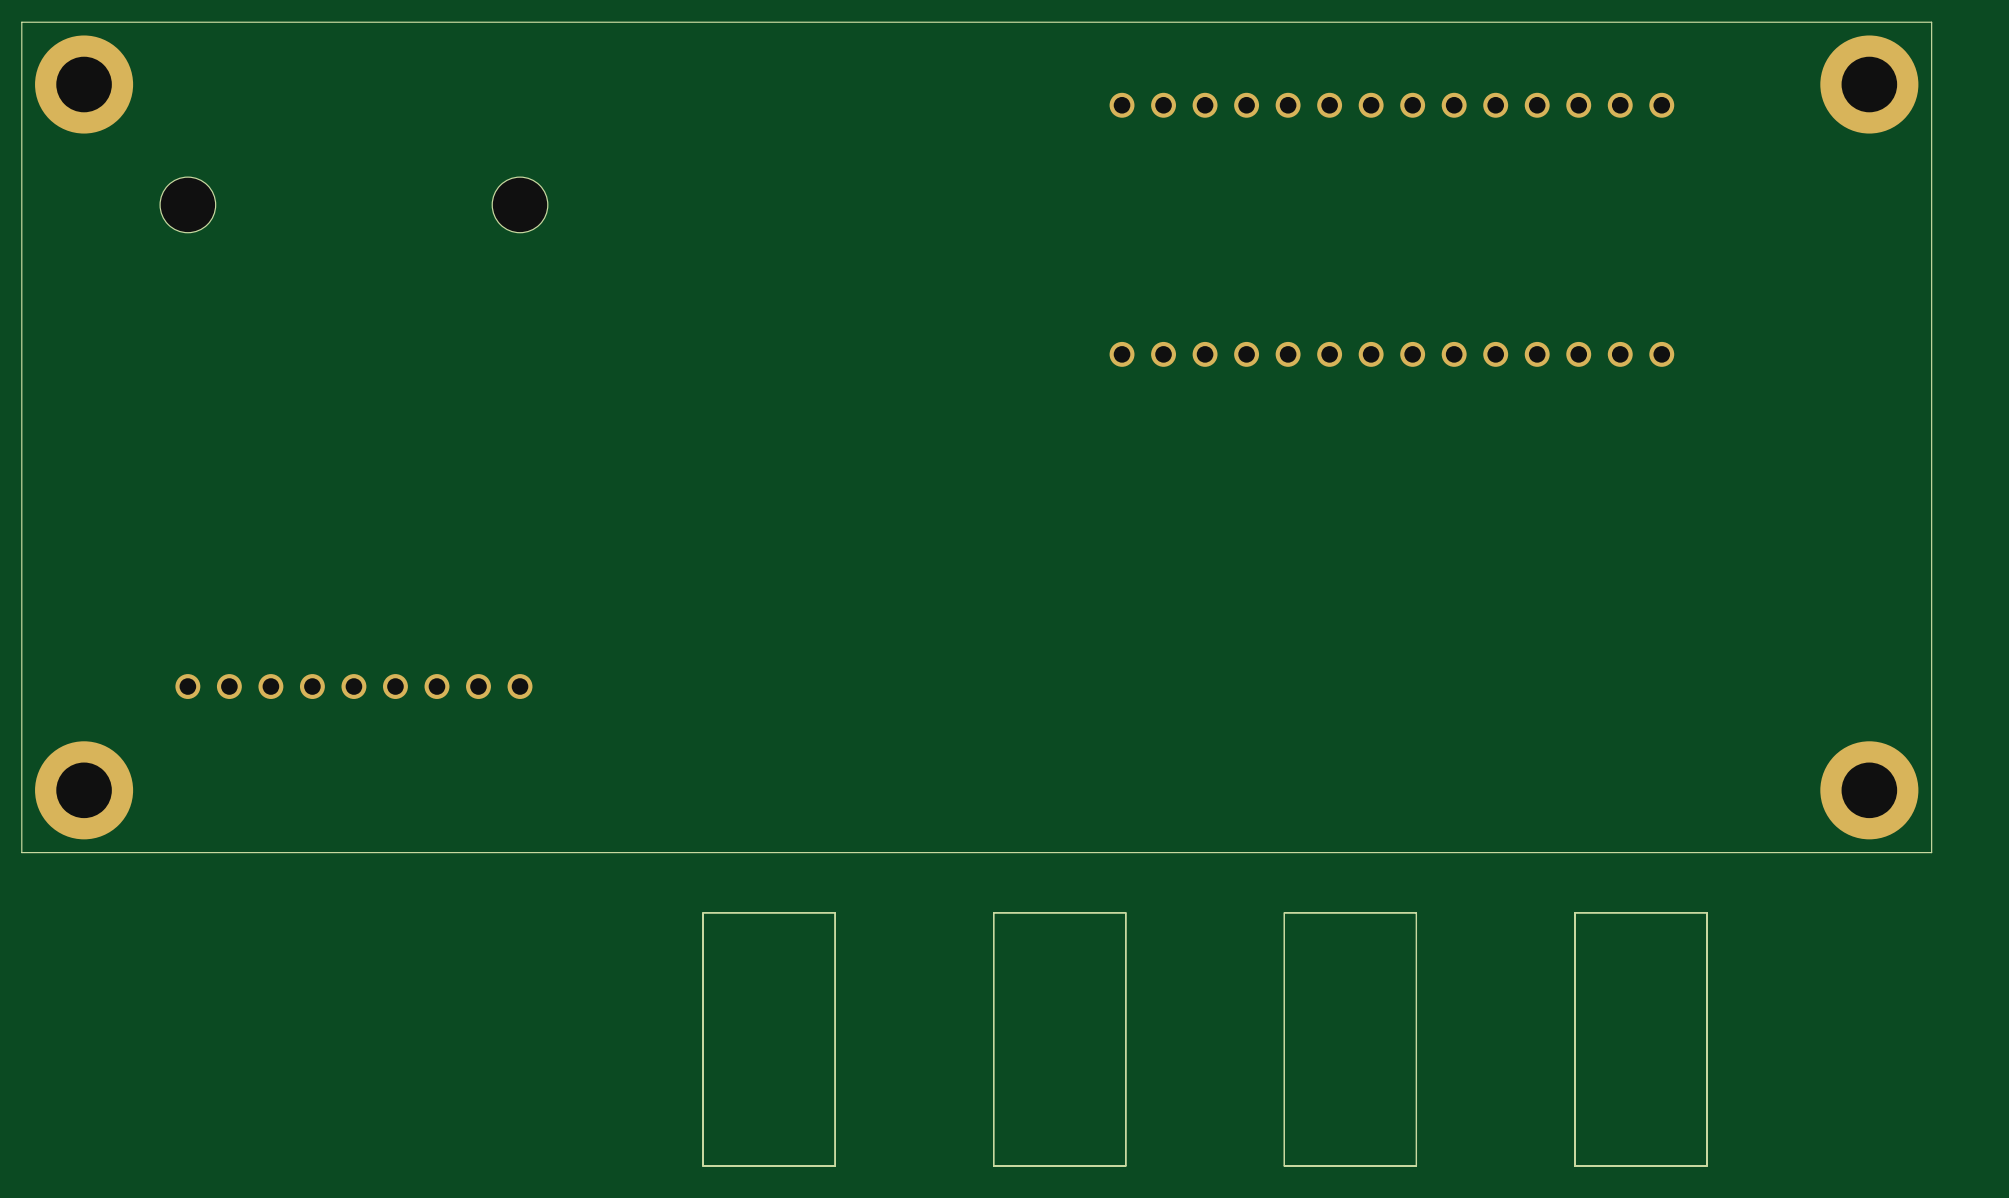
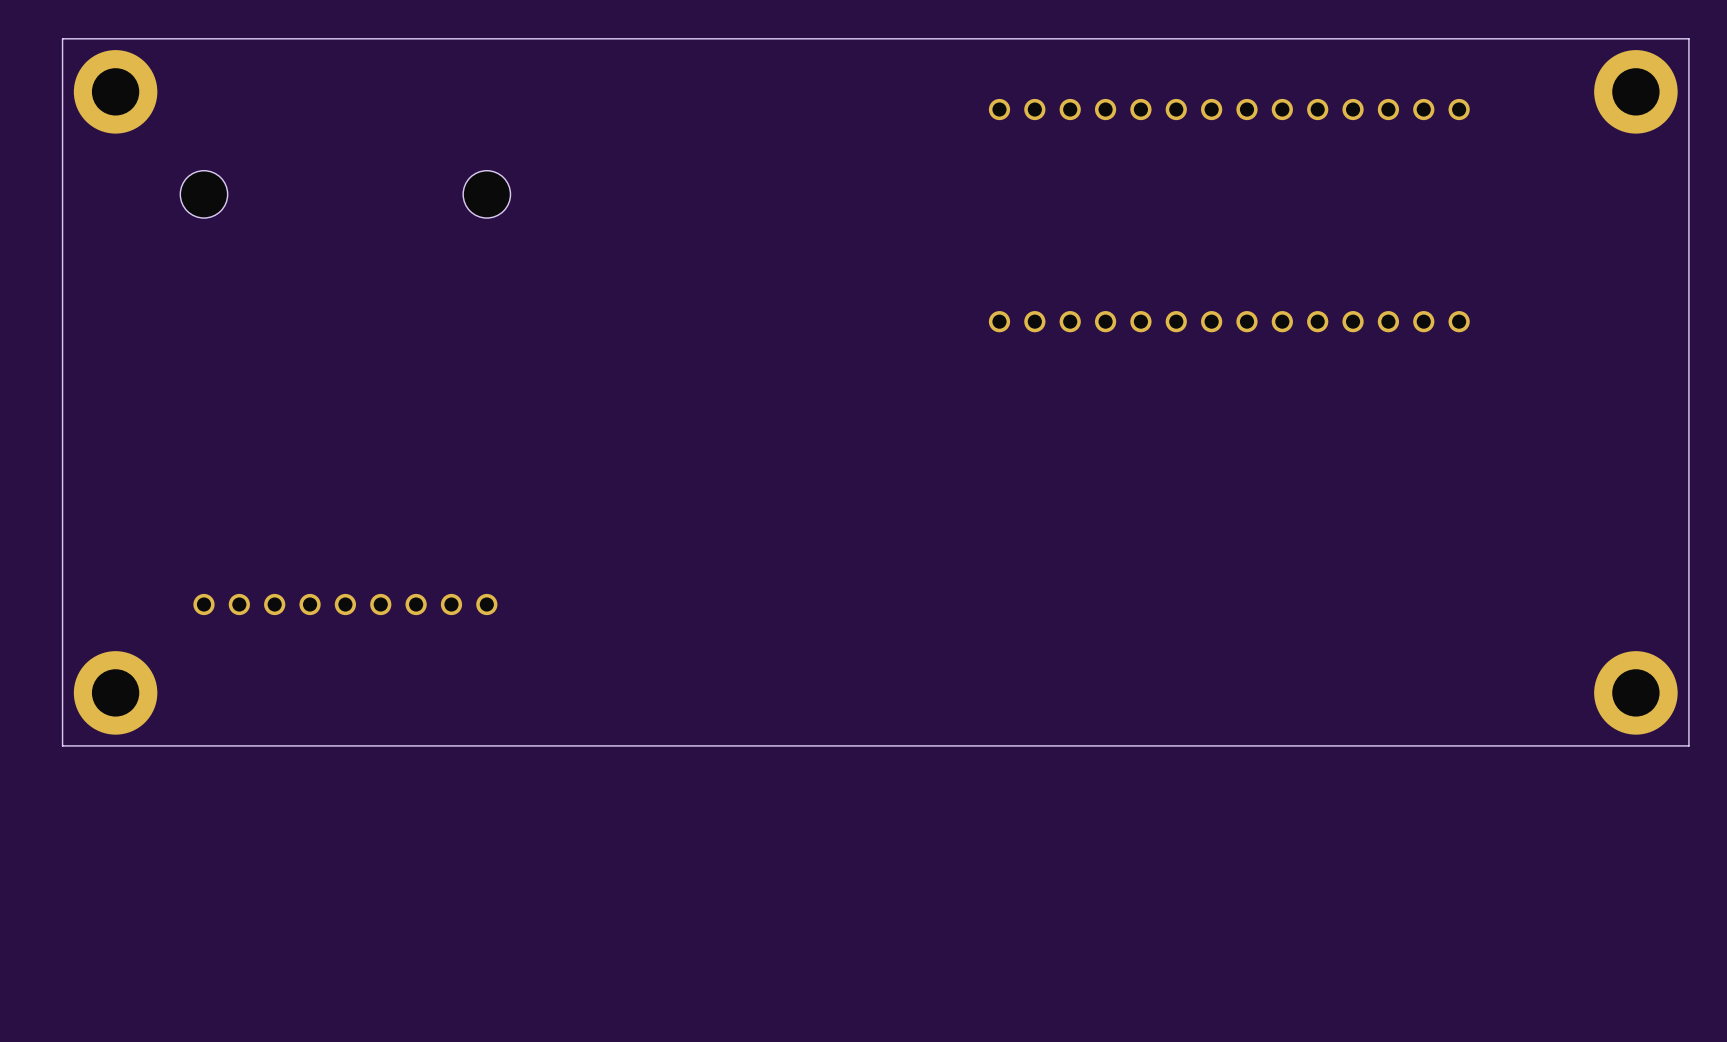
part: (769, 1039) -> none
part: (1059, 1039) -> none
part: (1350, 1039) -> none
part: (1641, 1039) -> none

